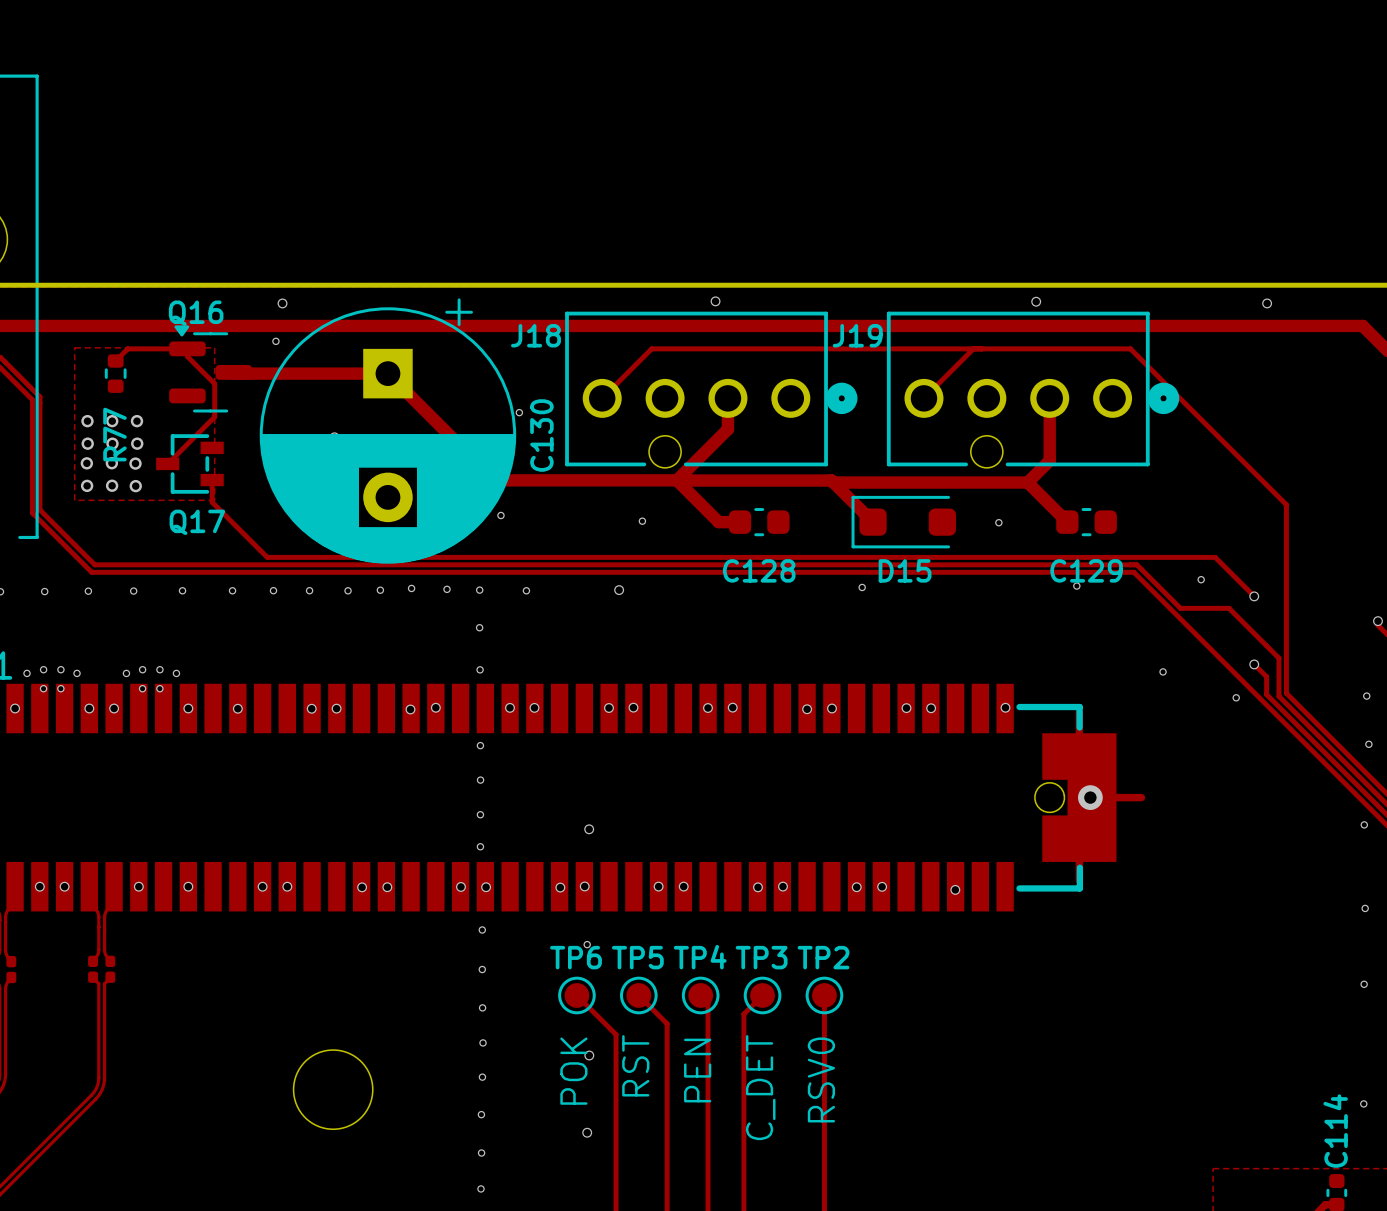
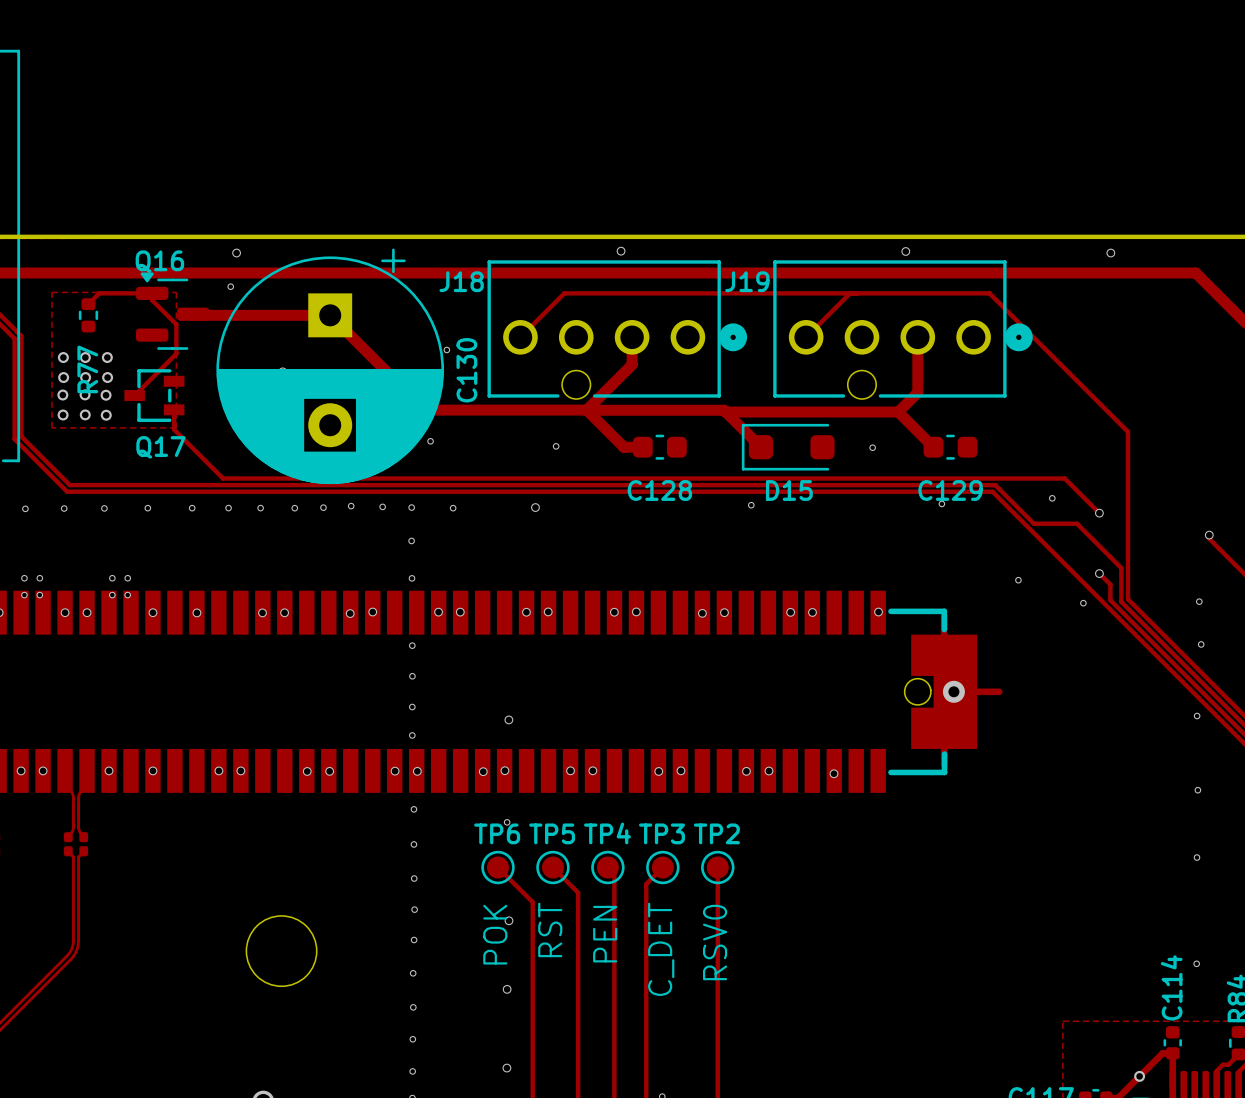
via: (27, 673) -> none
via: (77, 673) -> none
via: (126, 673) -> none
via: (176, 673) -> none

